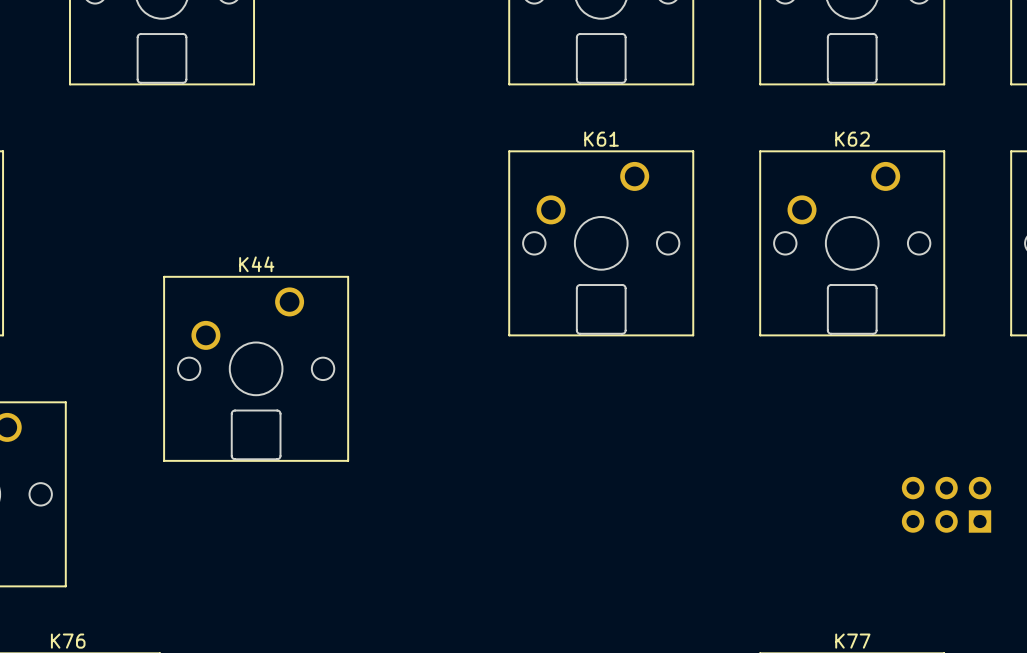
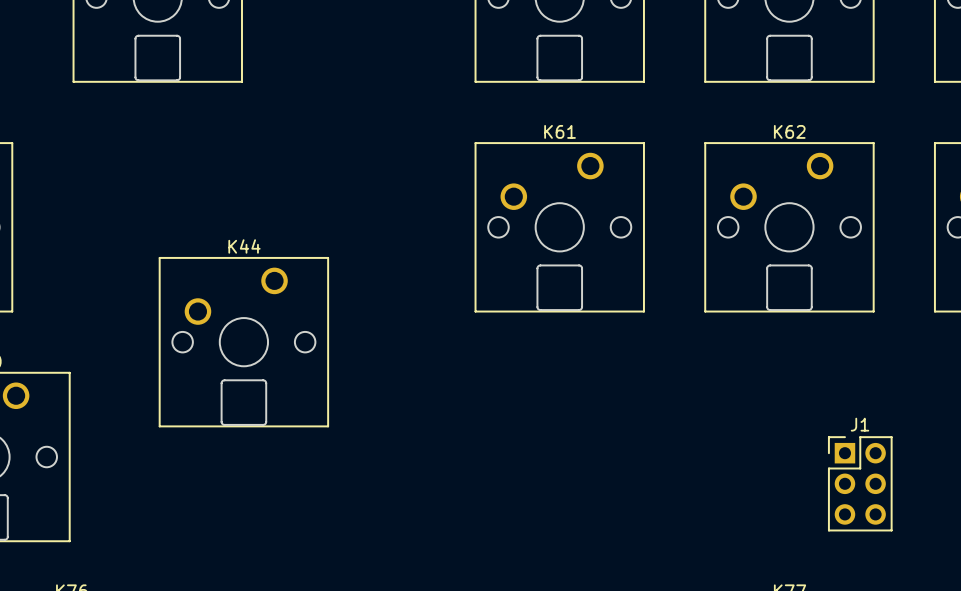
J1 side: bottom (946, 504) -> top (860, 483)

